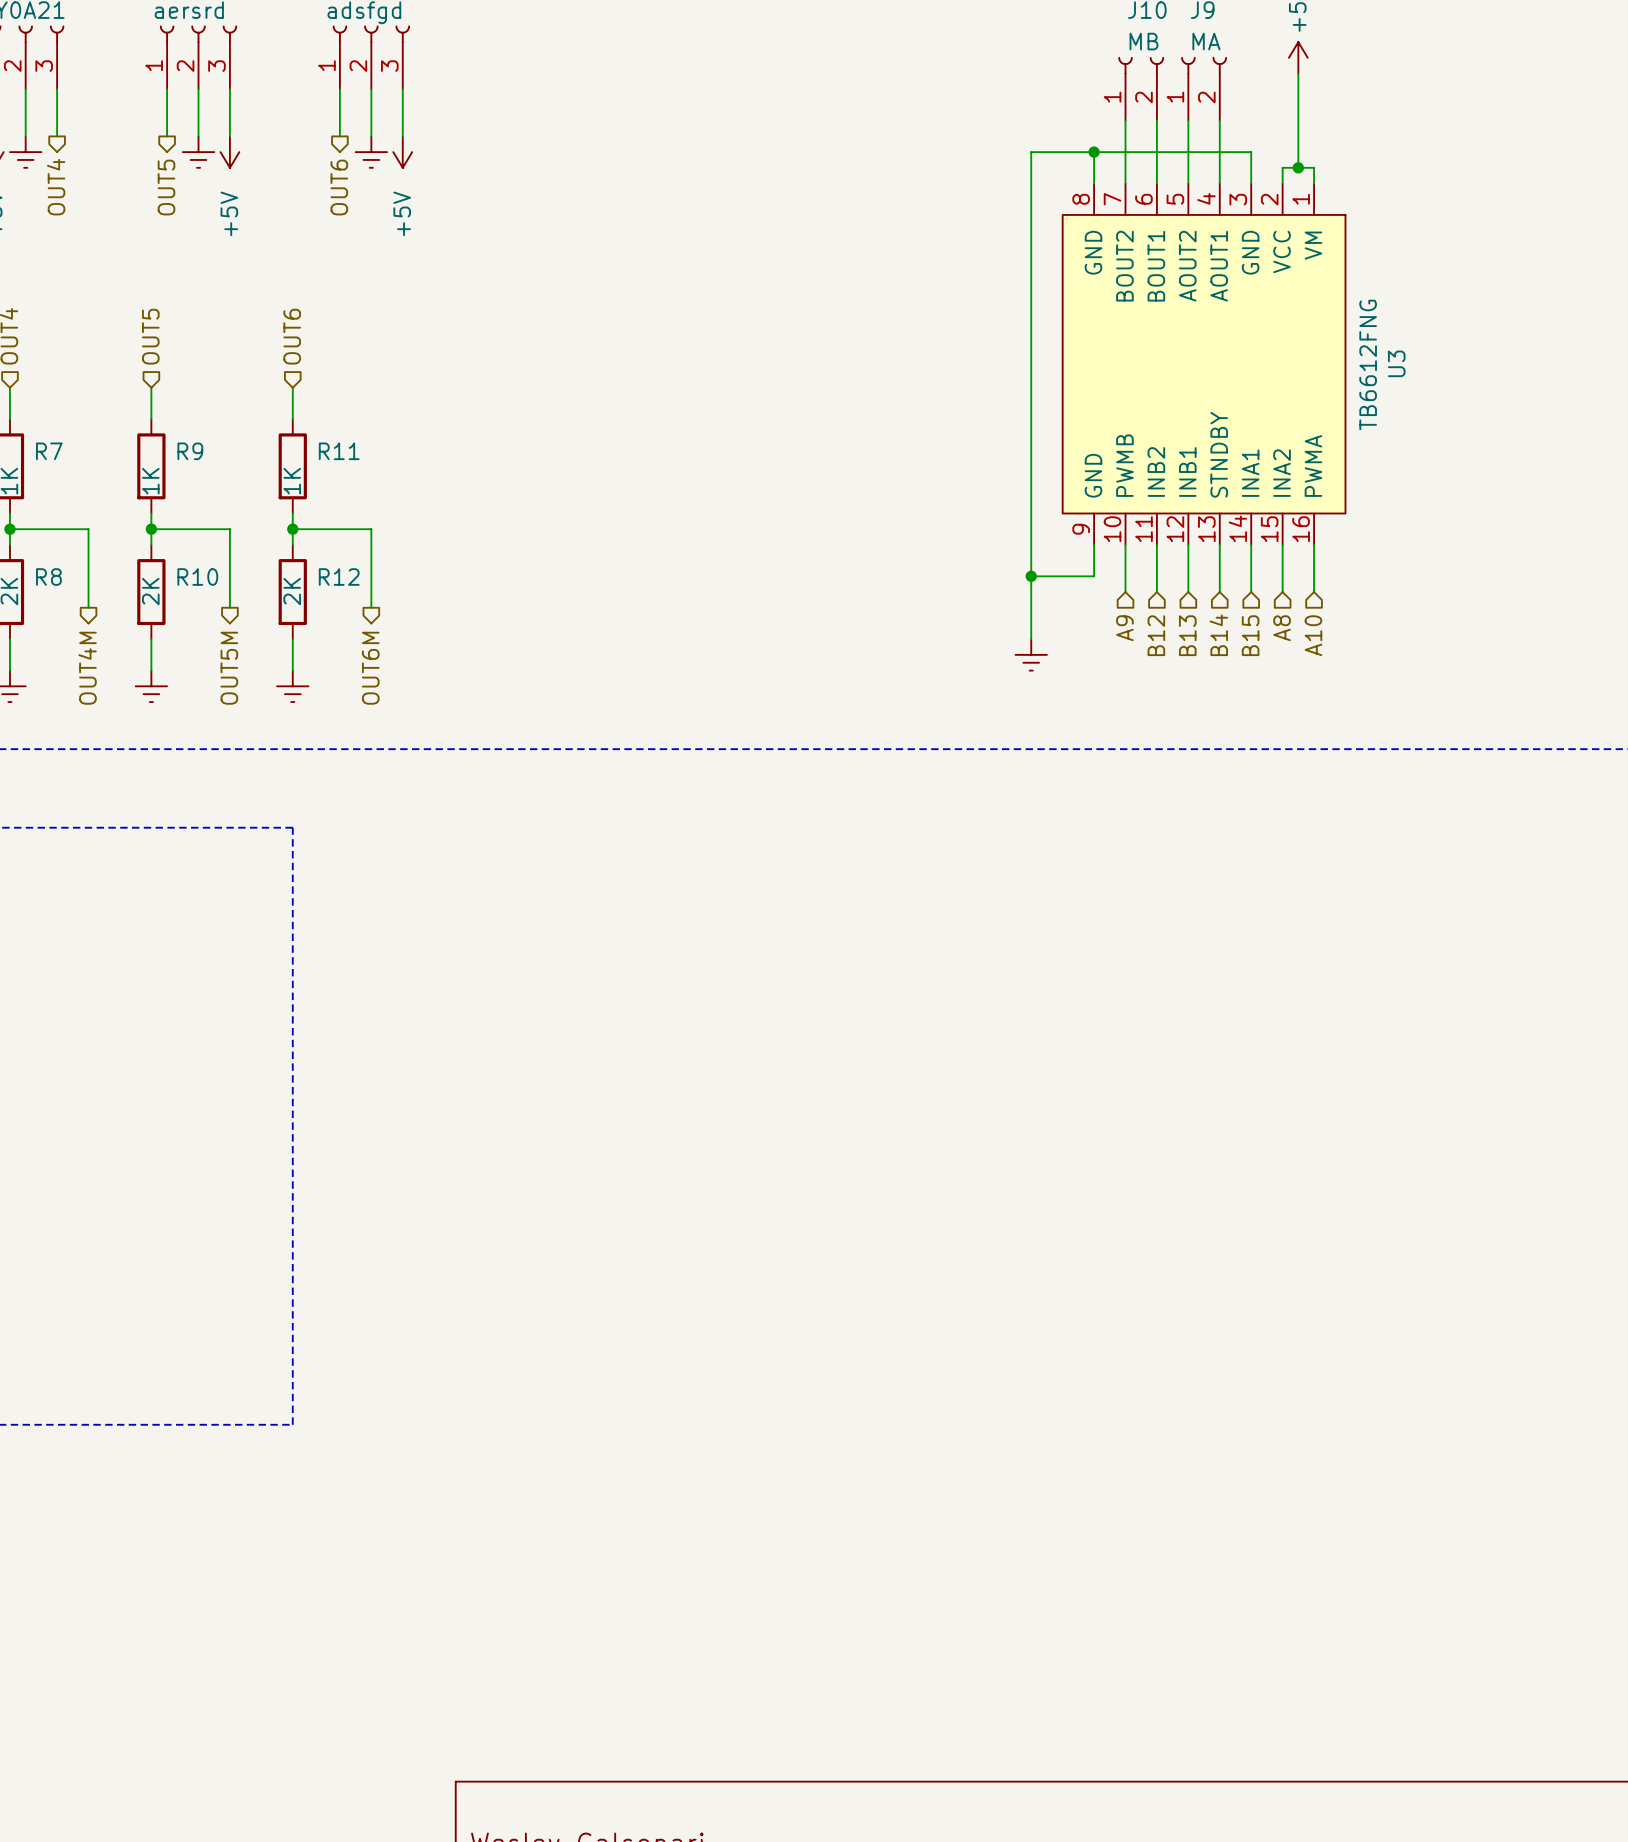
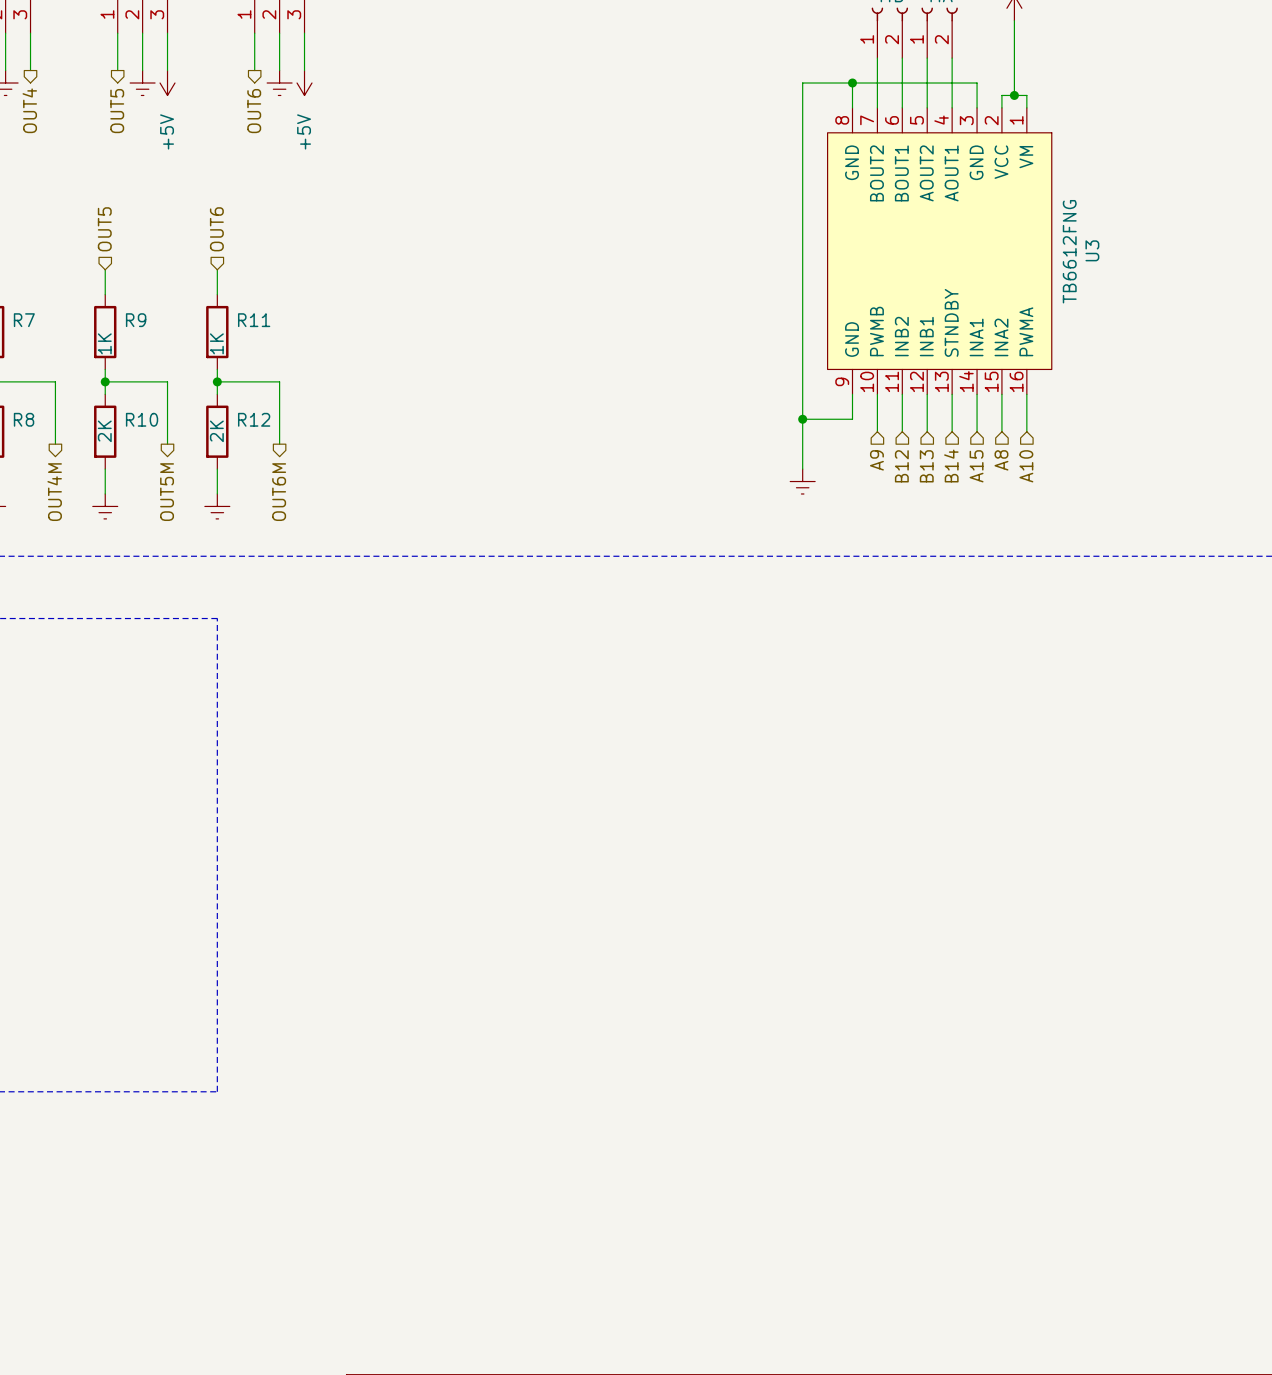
hierarchical label: B15 (1250, 635) -> A15 (976, 466)

